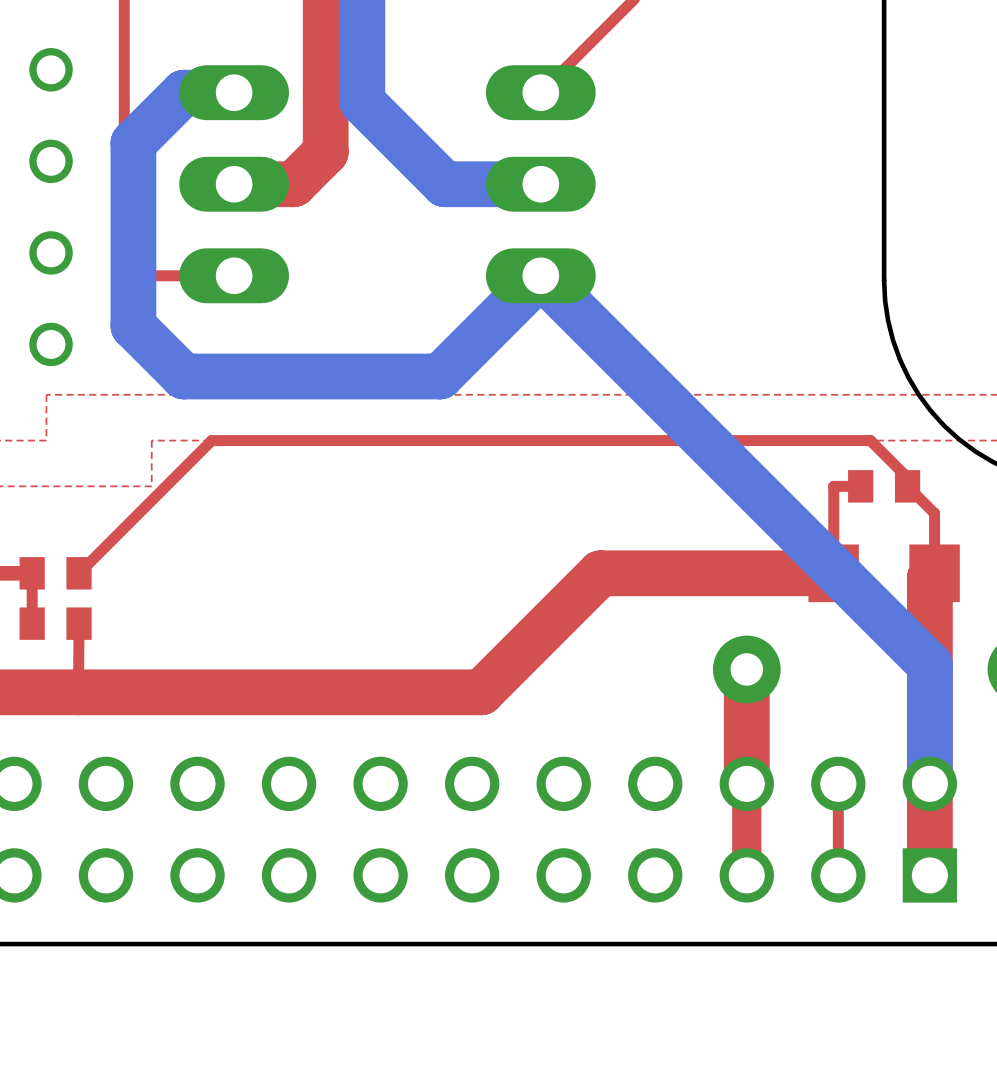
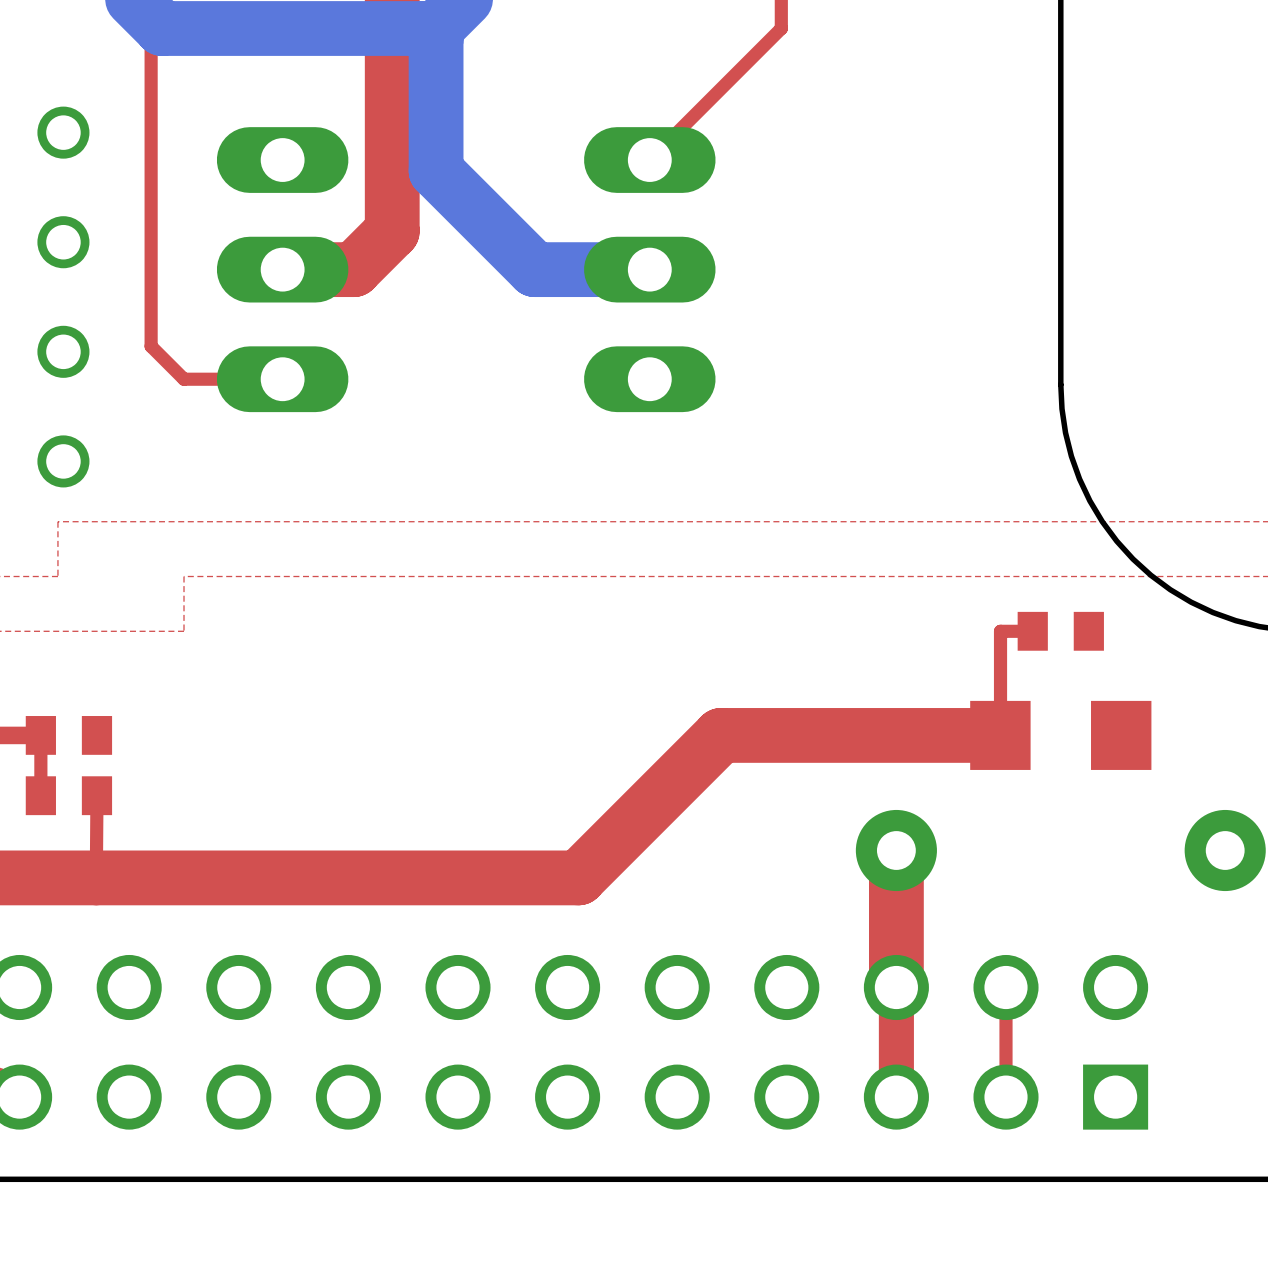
bottom track: (234, 92) (183, 92) (133, 143) (133, 326) (183, 376) (440, 376) (540, 275) (929, 664) (929, 783) -> none
top track: (79, 573) (211, 440) (870, 440) (907, 477) (907, 486) (934, 513) (934, 573) (929, 578) (929, 875) -> none

